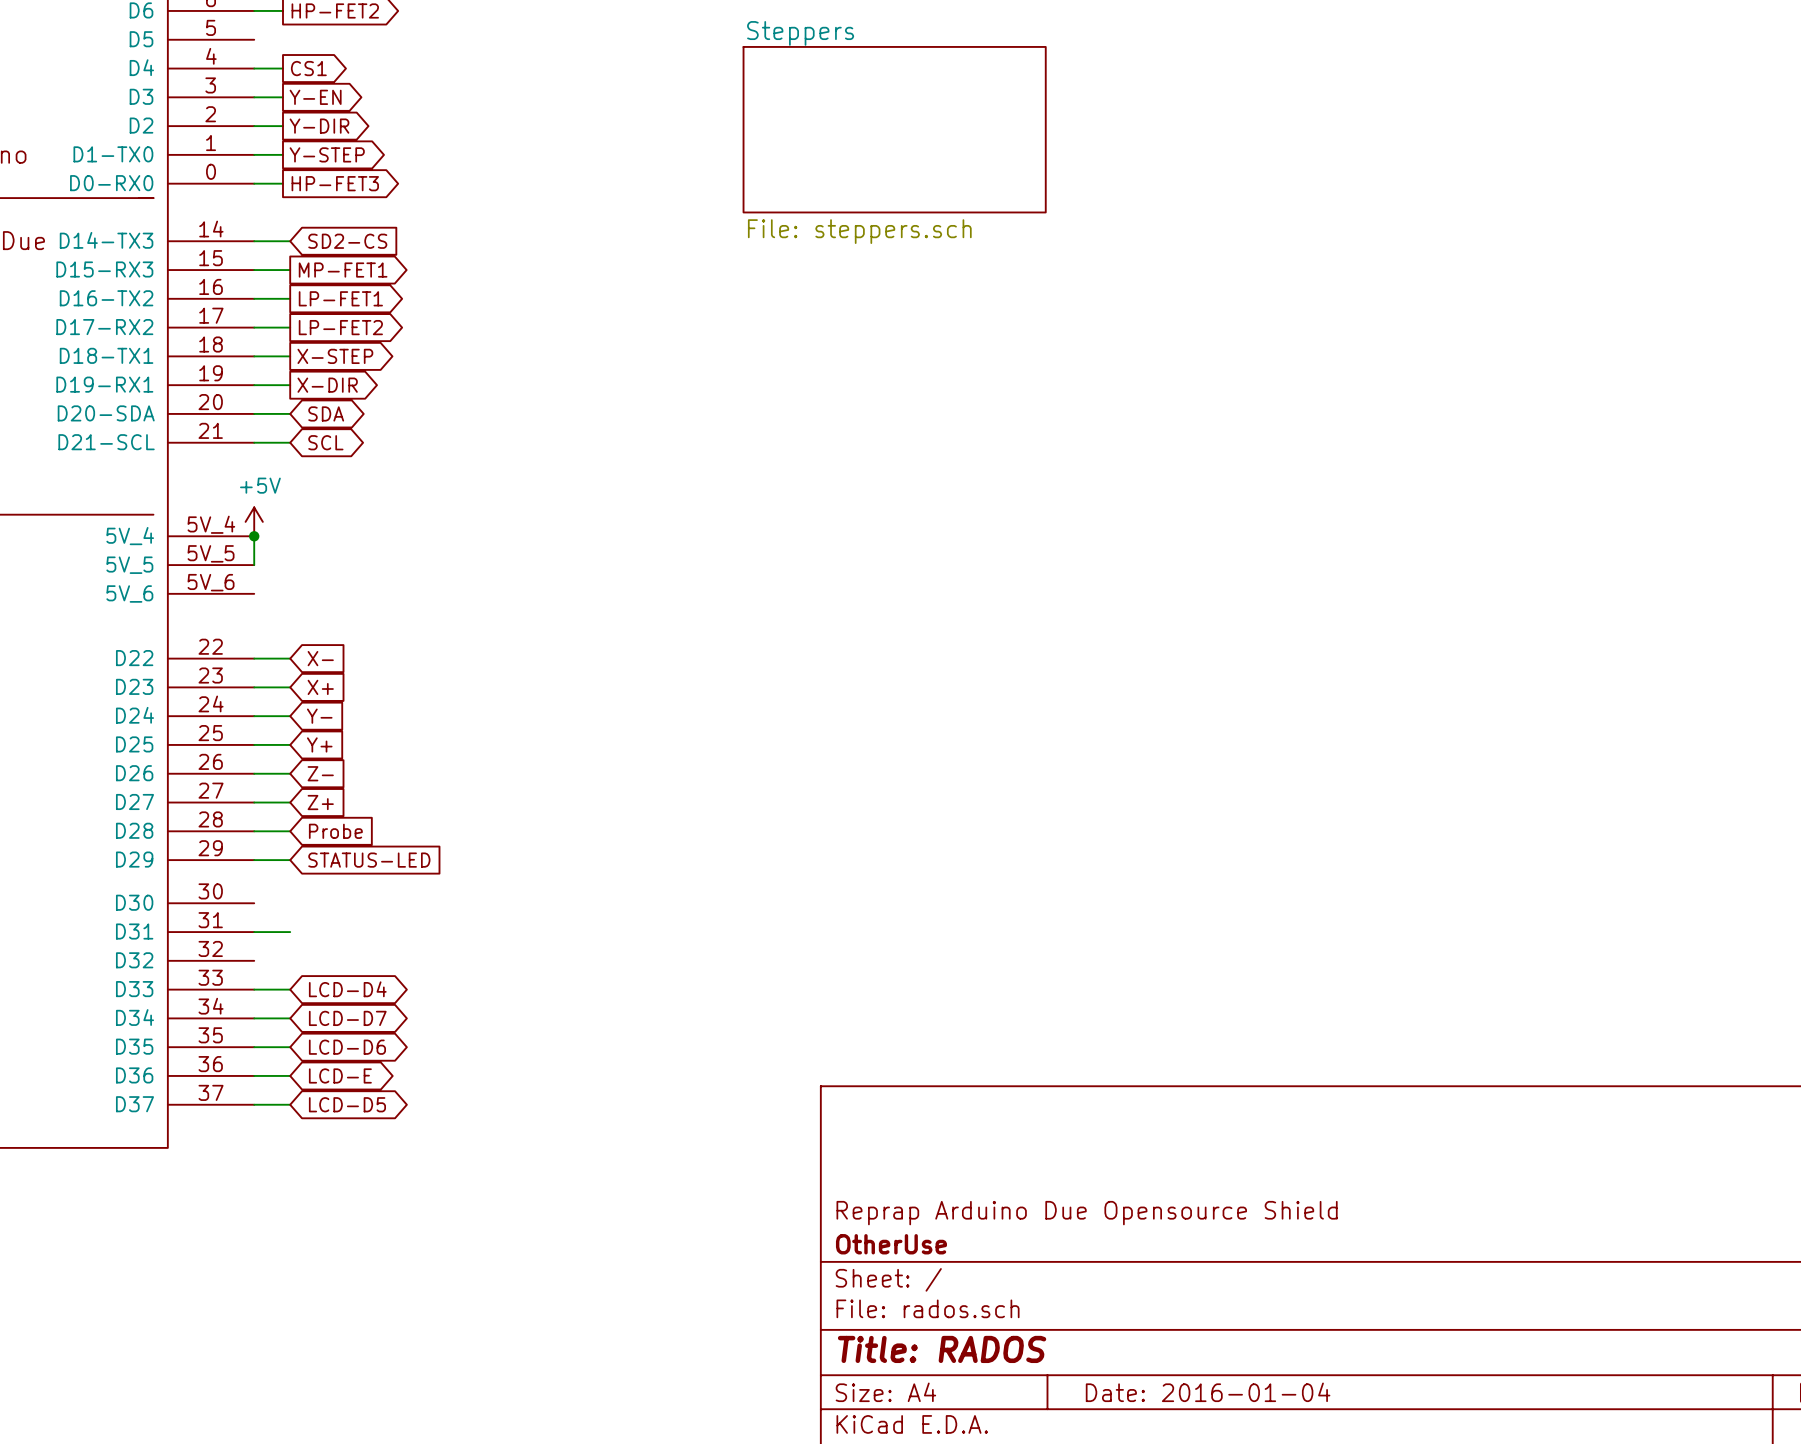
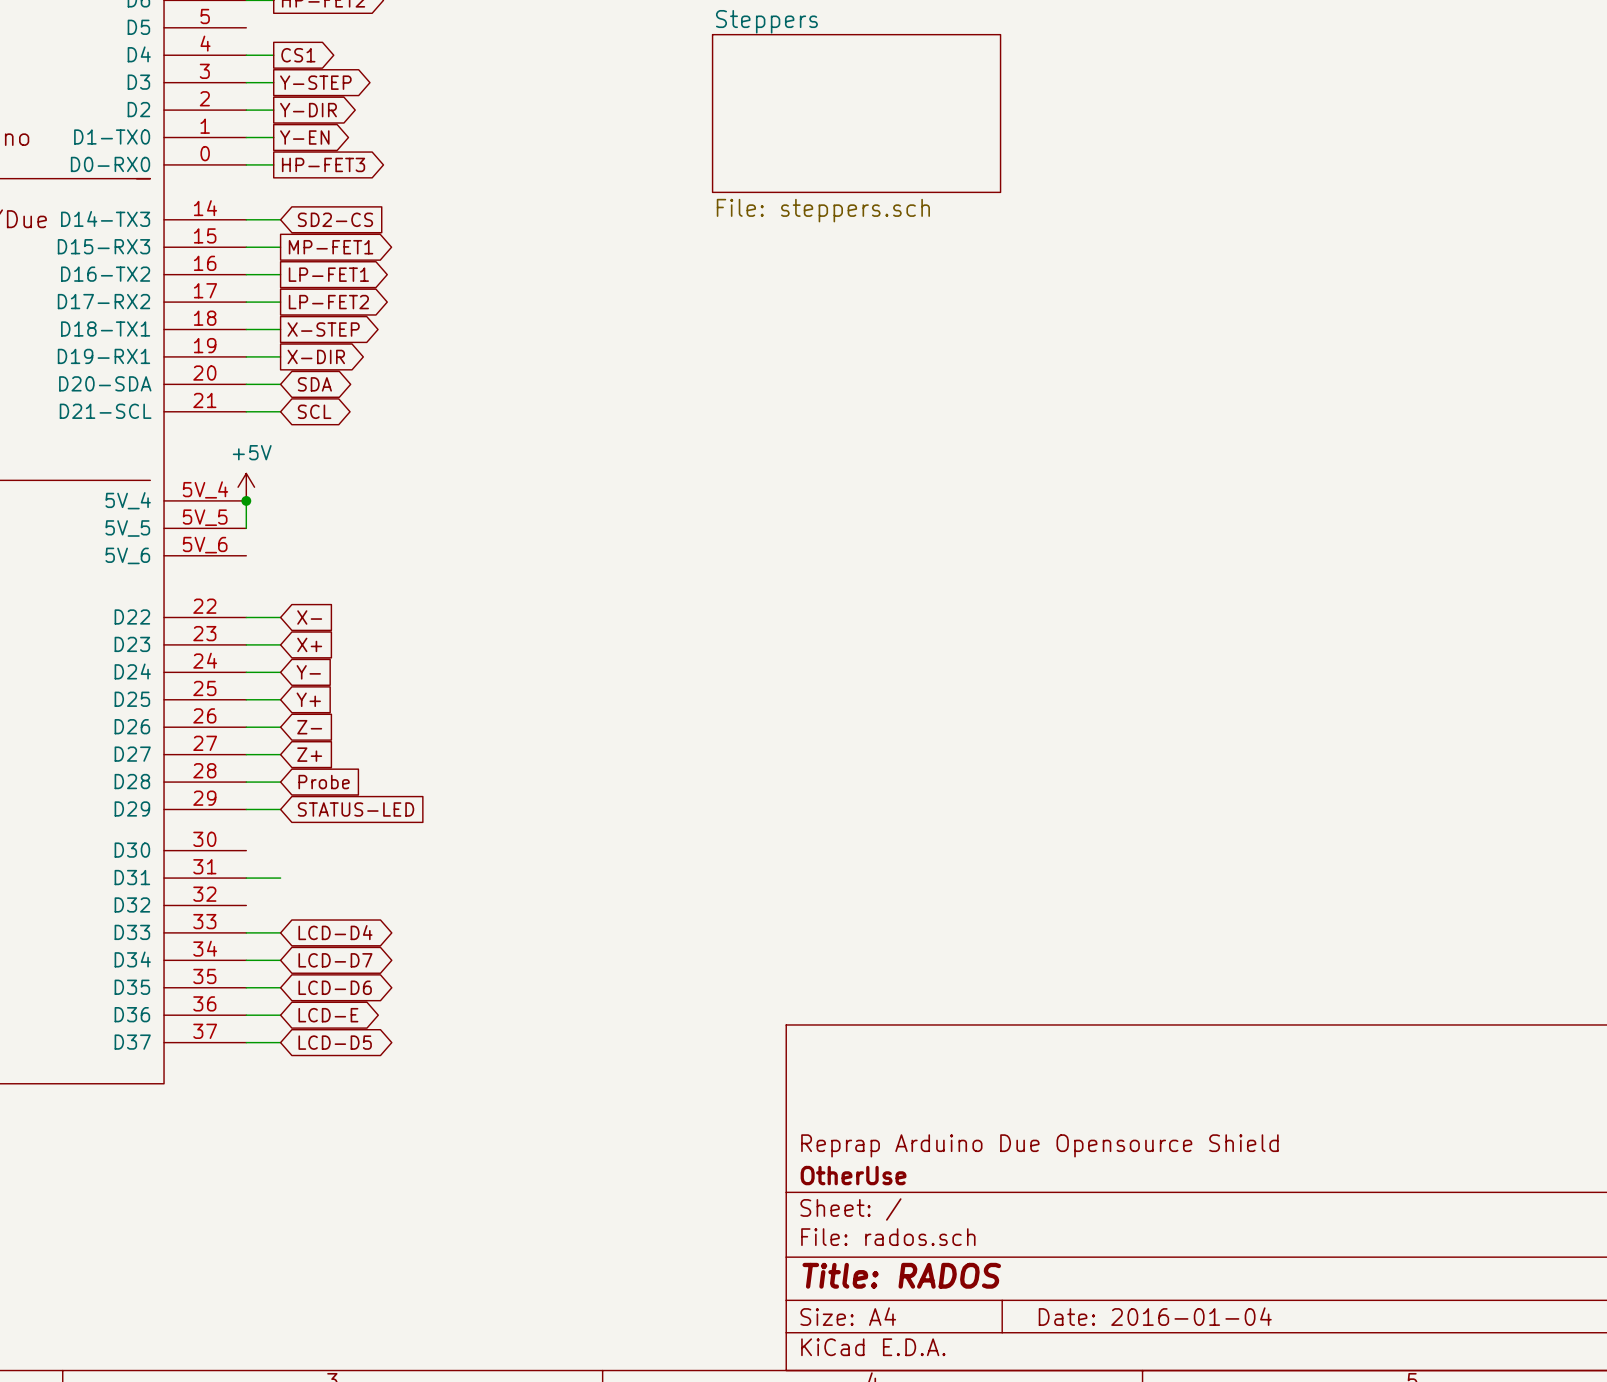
global label: Y-EN (315, 97) -> Y-STEP (315, 82)
global label: Y-STEP (327, 154) -> Y-EN (304, 137)

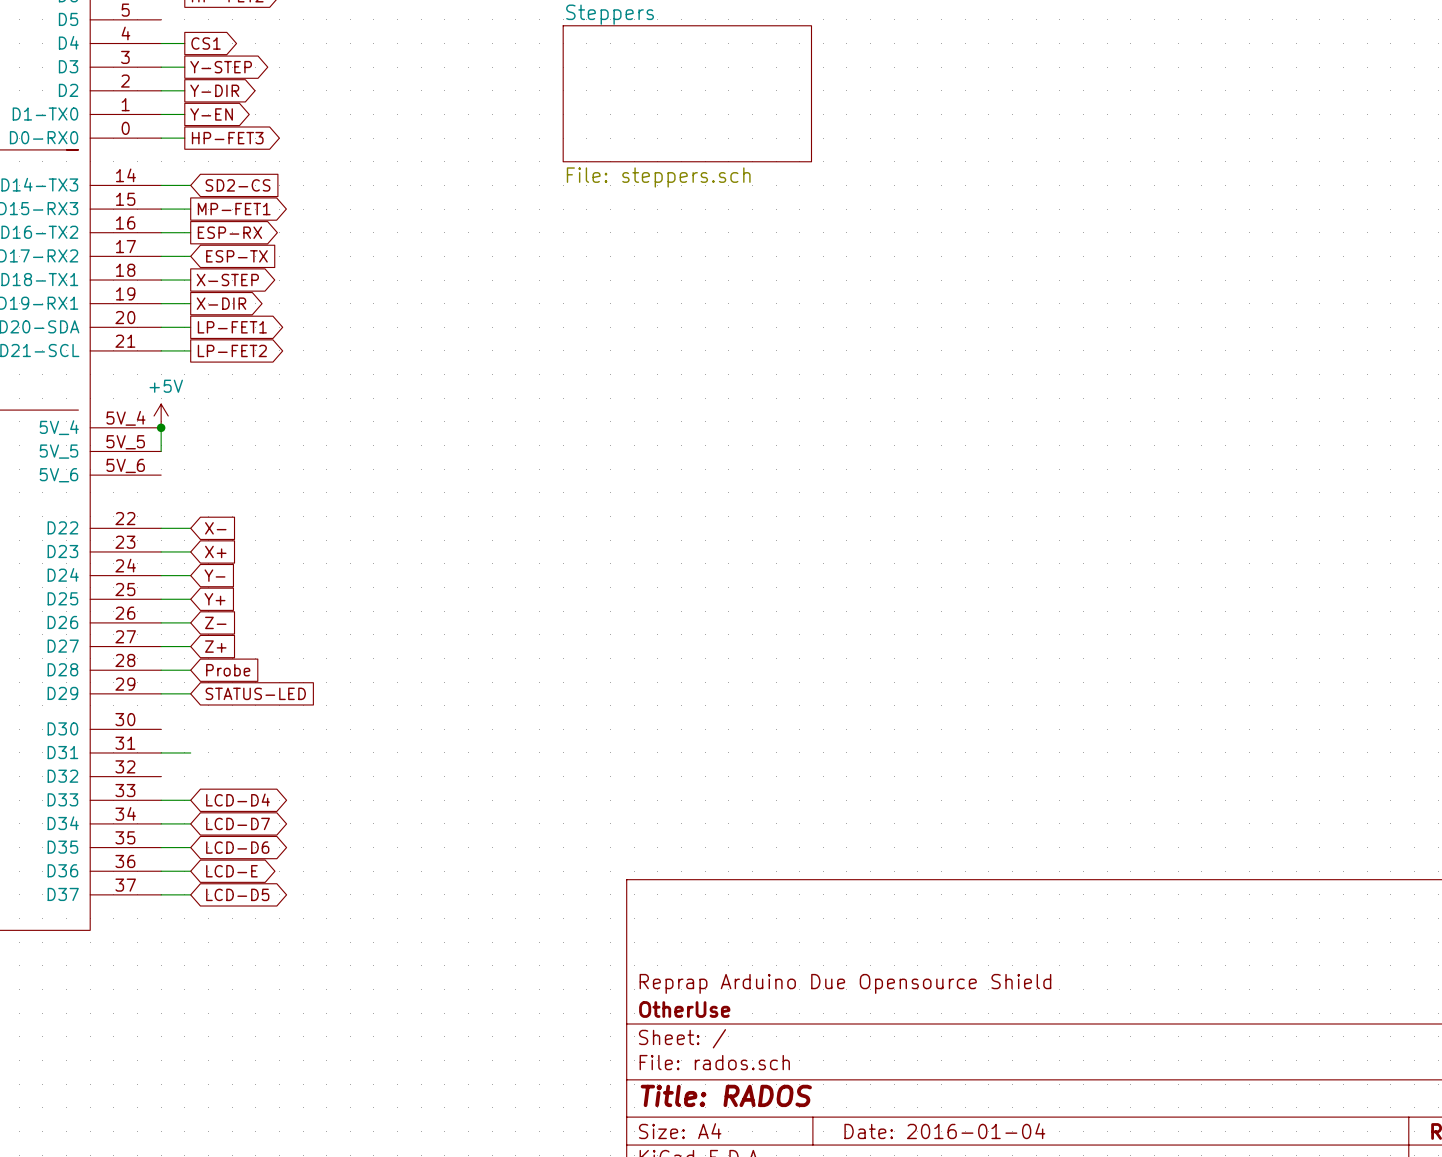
global label: LP-FET1 (328, 274) -> ESP-RX (229, 232)
global label shape: output (328, 302) -> input (236, 256)
global label: LP-FET2 (328, 302) -> ESP-TX (236, 256)
global label shape: bidirectional (314, 384) -> output (232, 327)
global label: SDA (314, 384) -> LP-FET1 (232, 327)
global label shape: bidirectional (314, 411) -> output (232, 350)
global label: SCL (314, 411) -> LP-FET2 (232, 350)

